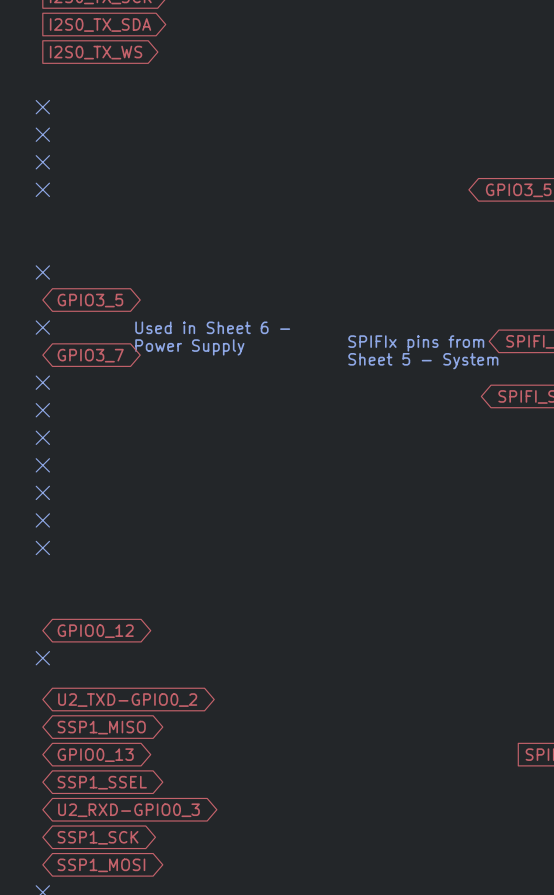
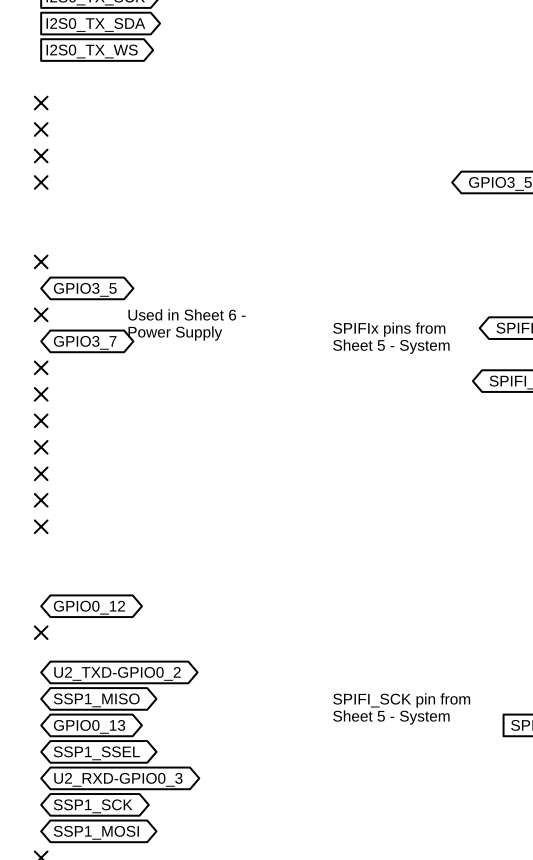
text: none -> SPIFI_SCK pin from (401, 700)
text: none -> Sheet 5 - System (391, 717)

